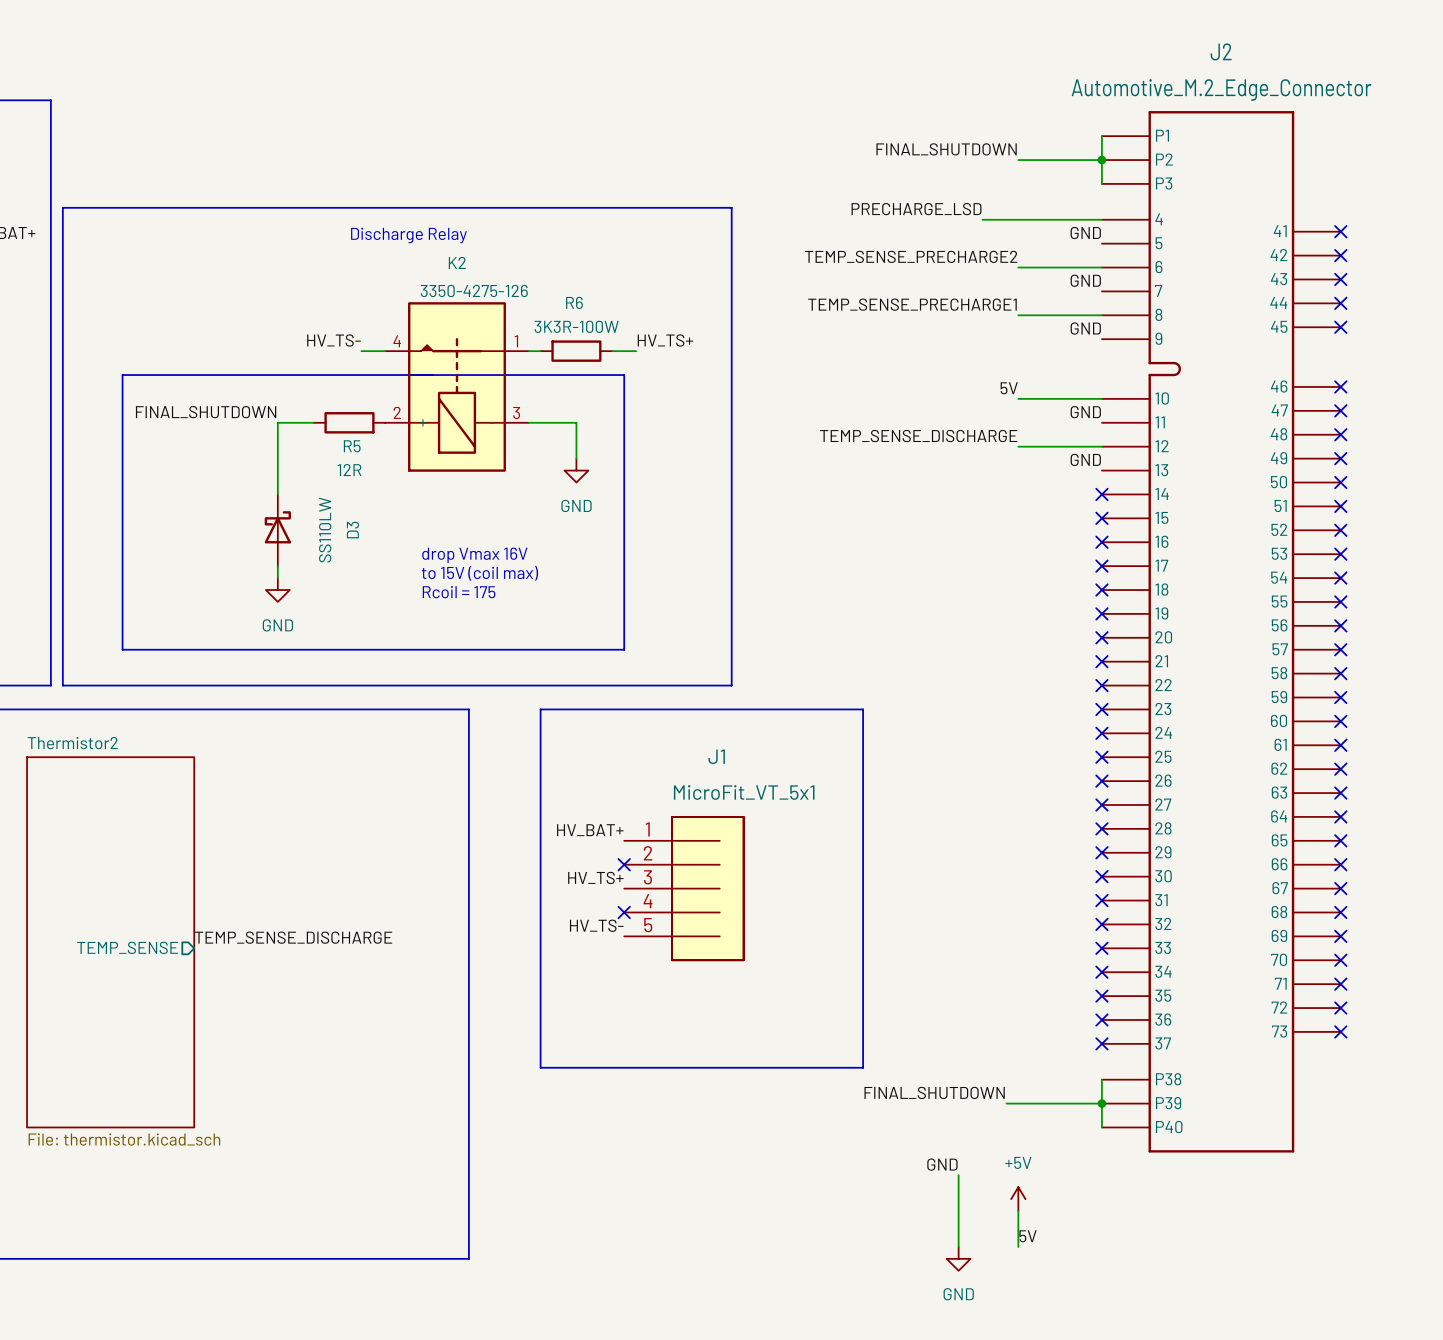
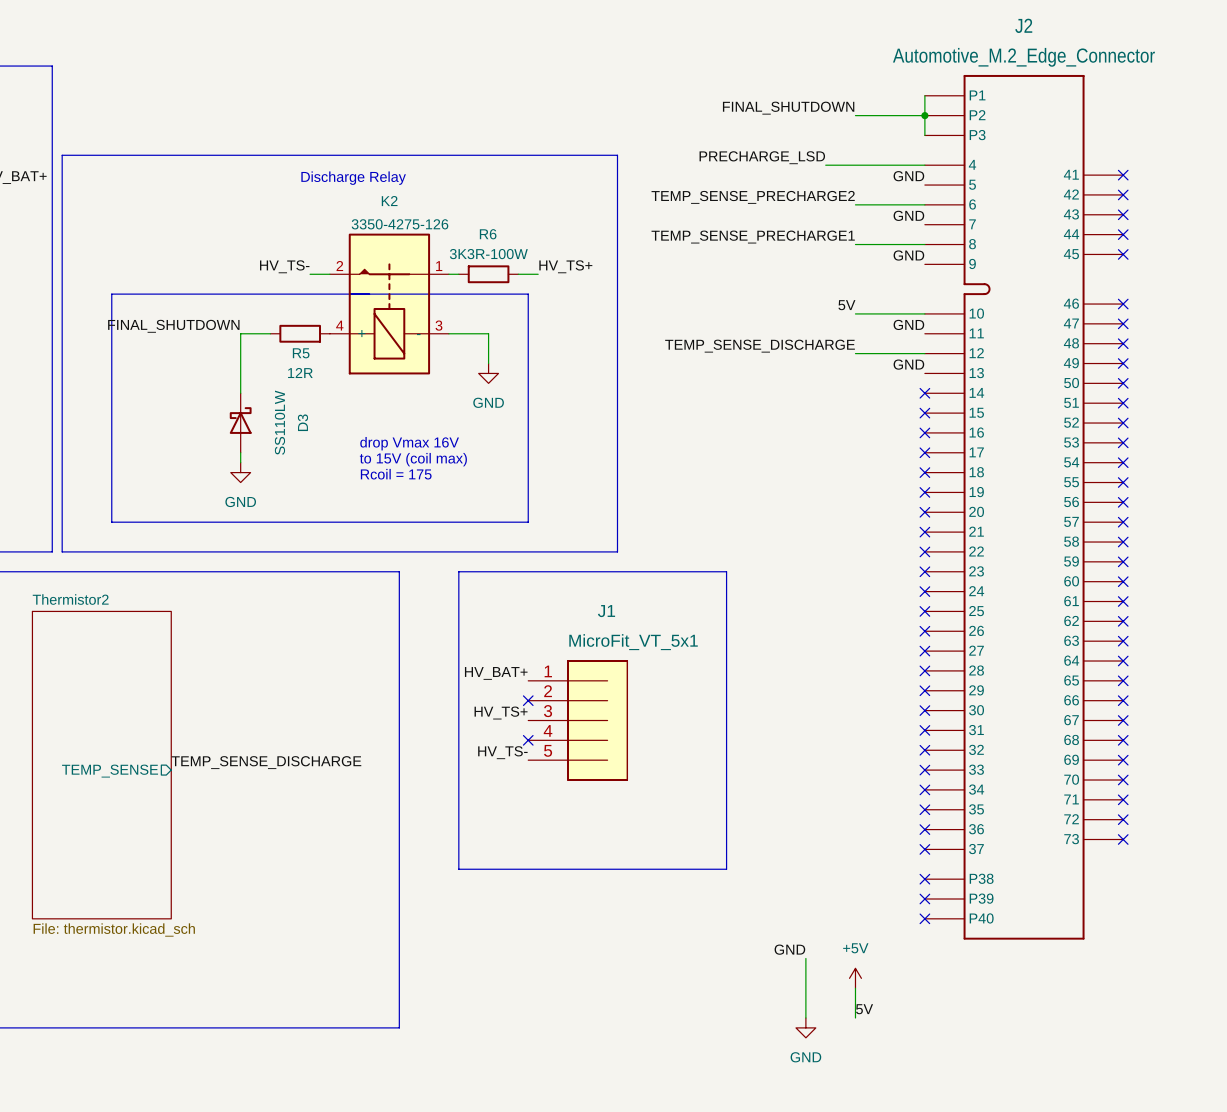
K2 pin number: 4 (397, 341) -> 2 (339, 266)
K2 pin number: 2 (397, 412) -> 4 (339, 325)
wire: (1101, 1079) (1101, 1127) -> none
no-connect mark: none -> (924, 879)
label: FINAL_SHUTDOWN (934, 1092) -> none
wire: (1006, 1103) (1101, 1103) -> none
junction: (1101, 1103) -> none
no-connect mark: none -> (924, 899)
no-connect mark: none -> (924, 918)

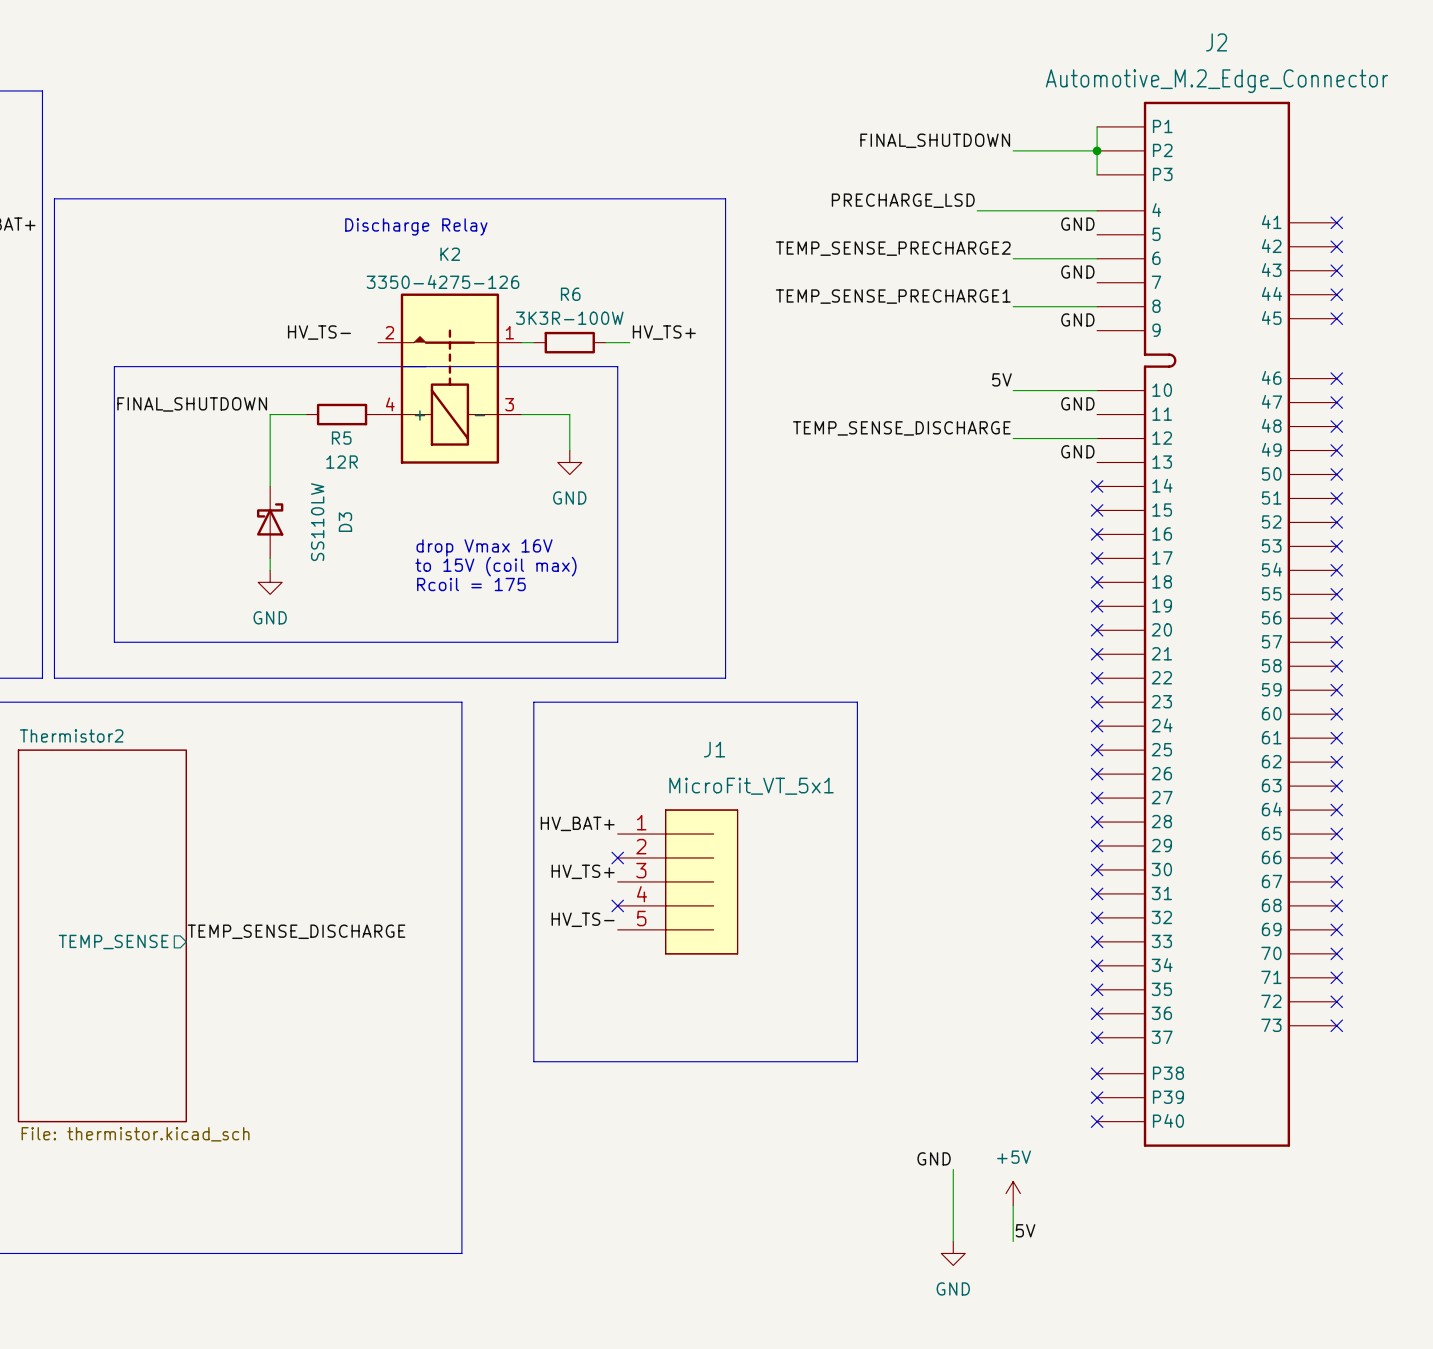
wire: (310, 274) (329, 274) -> none

